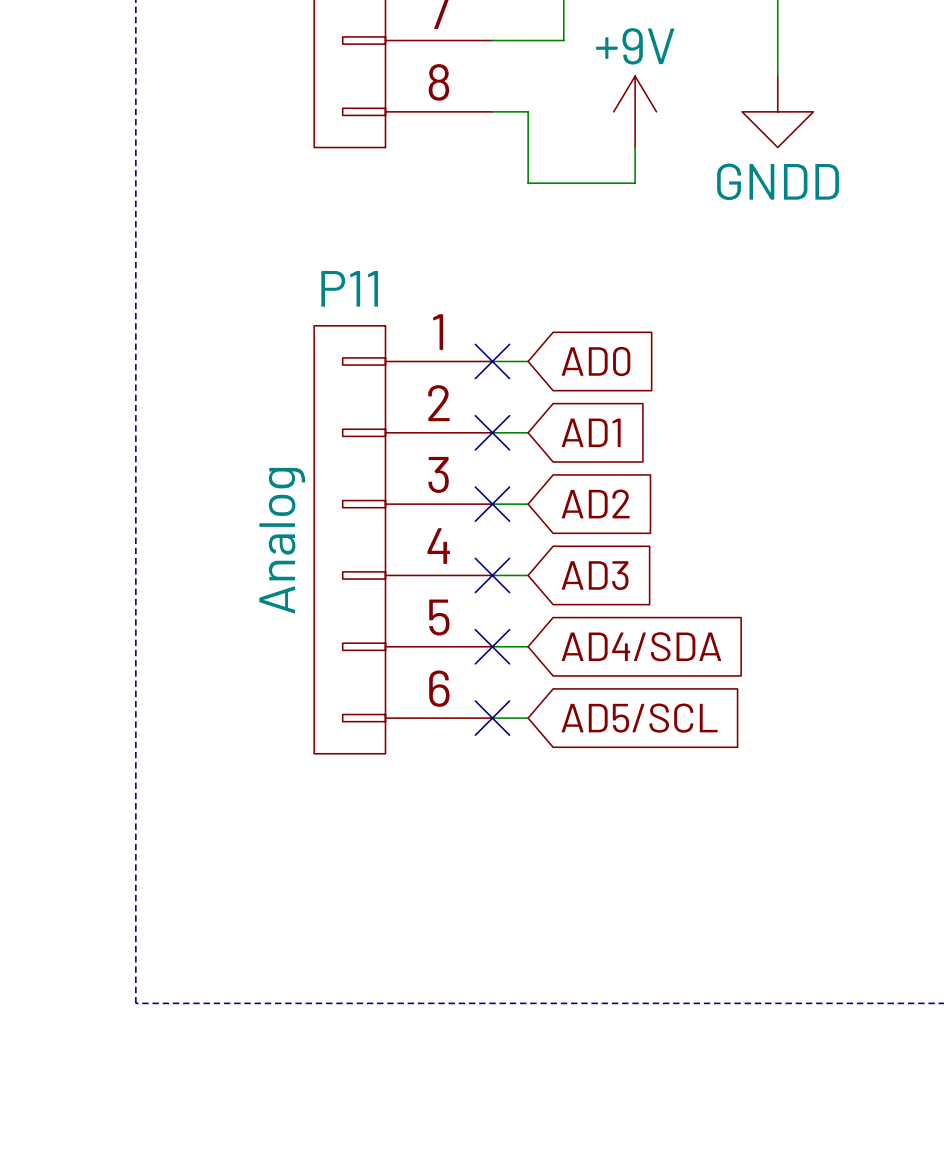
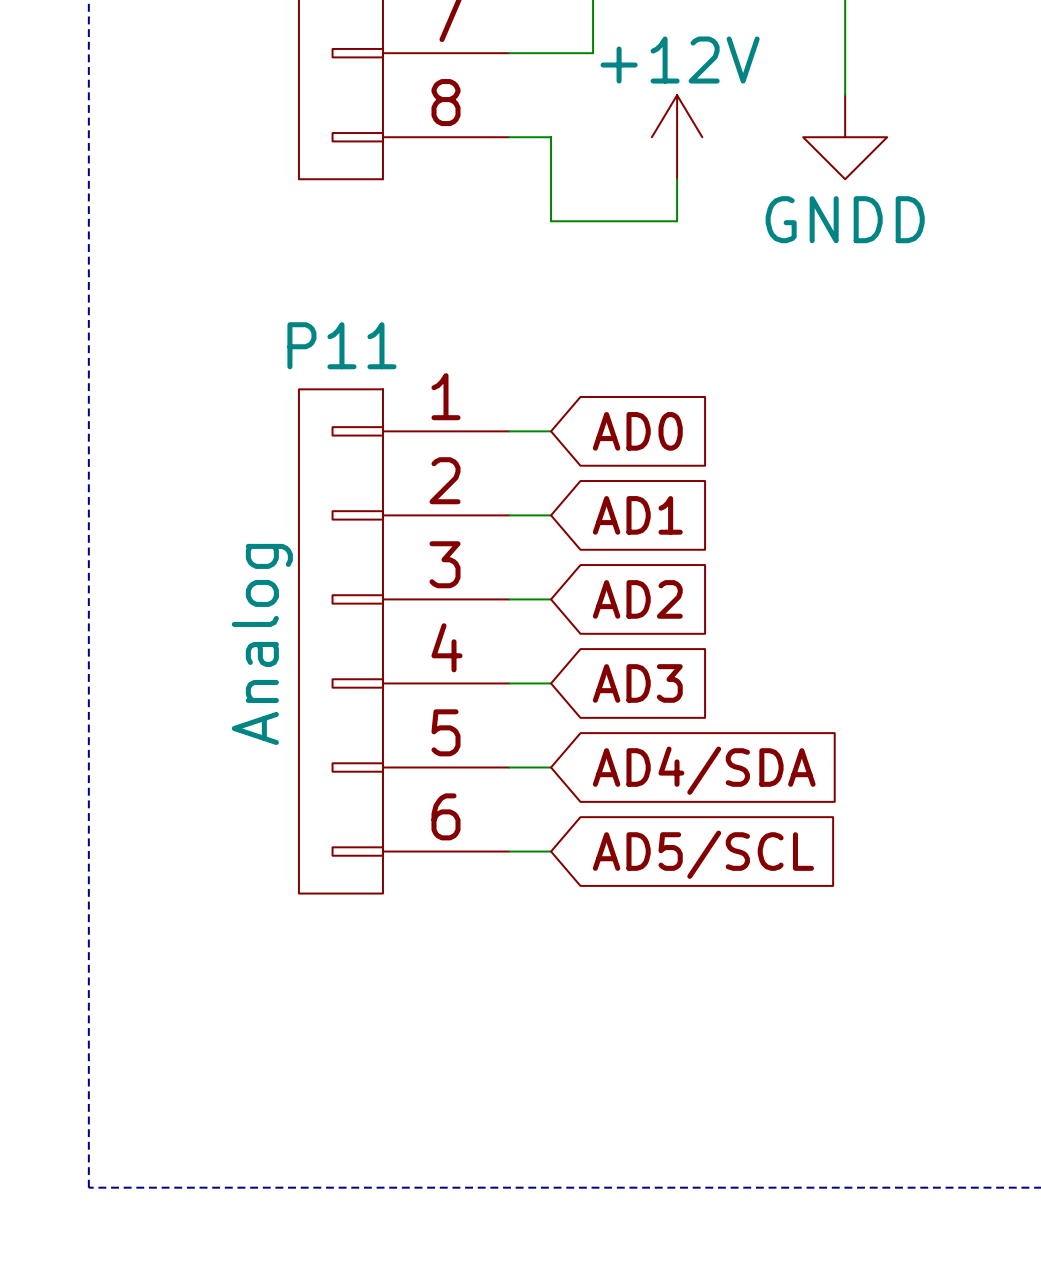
power symbol: +9V (635, 111) -> +12V (677, 137)
no-connect mark: (492, 361) -> none
no-connect mark: (492, 432) -> none
no-connect mark: (492, 504) -> none
no-connect mark: (492, 575) -> none
no-connect mark: (492, 646) -> none
no-connect mark: (492, 718) -> none

